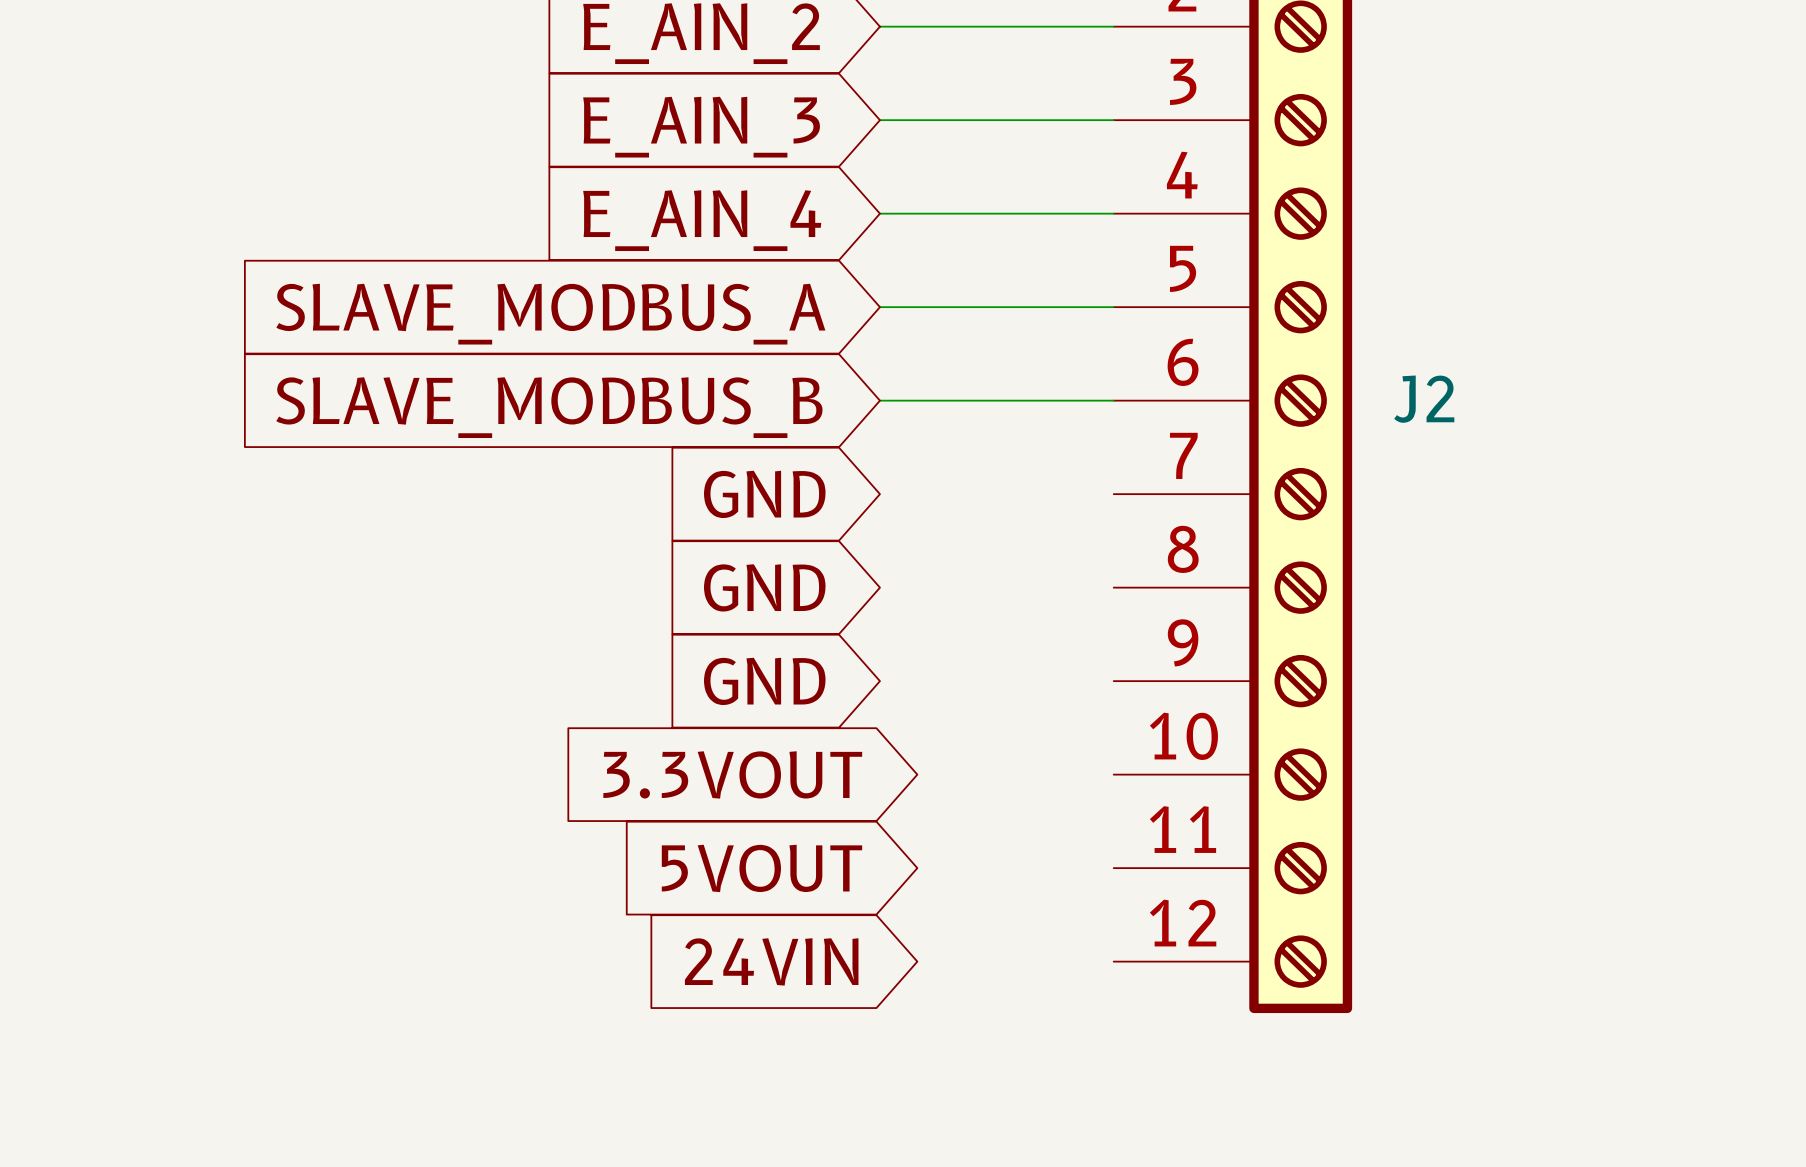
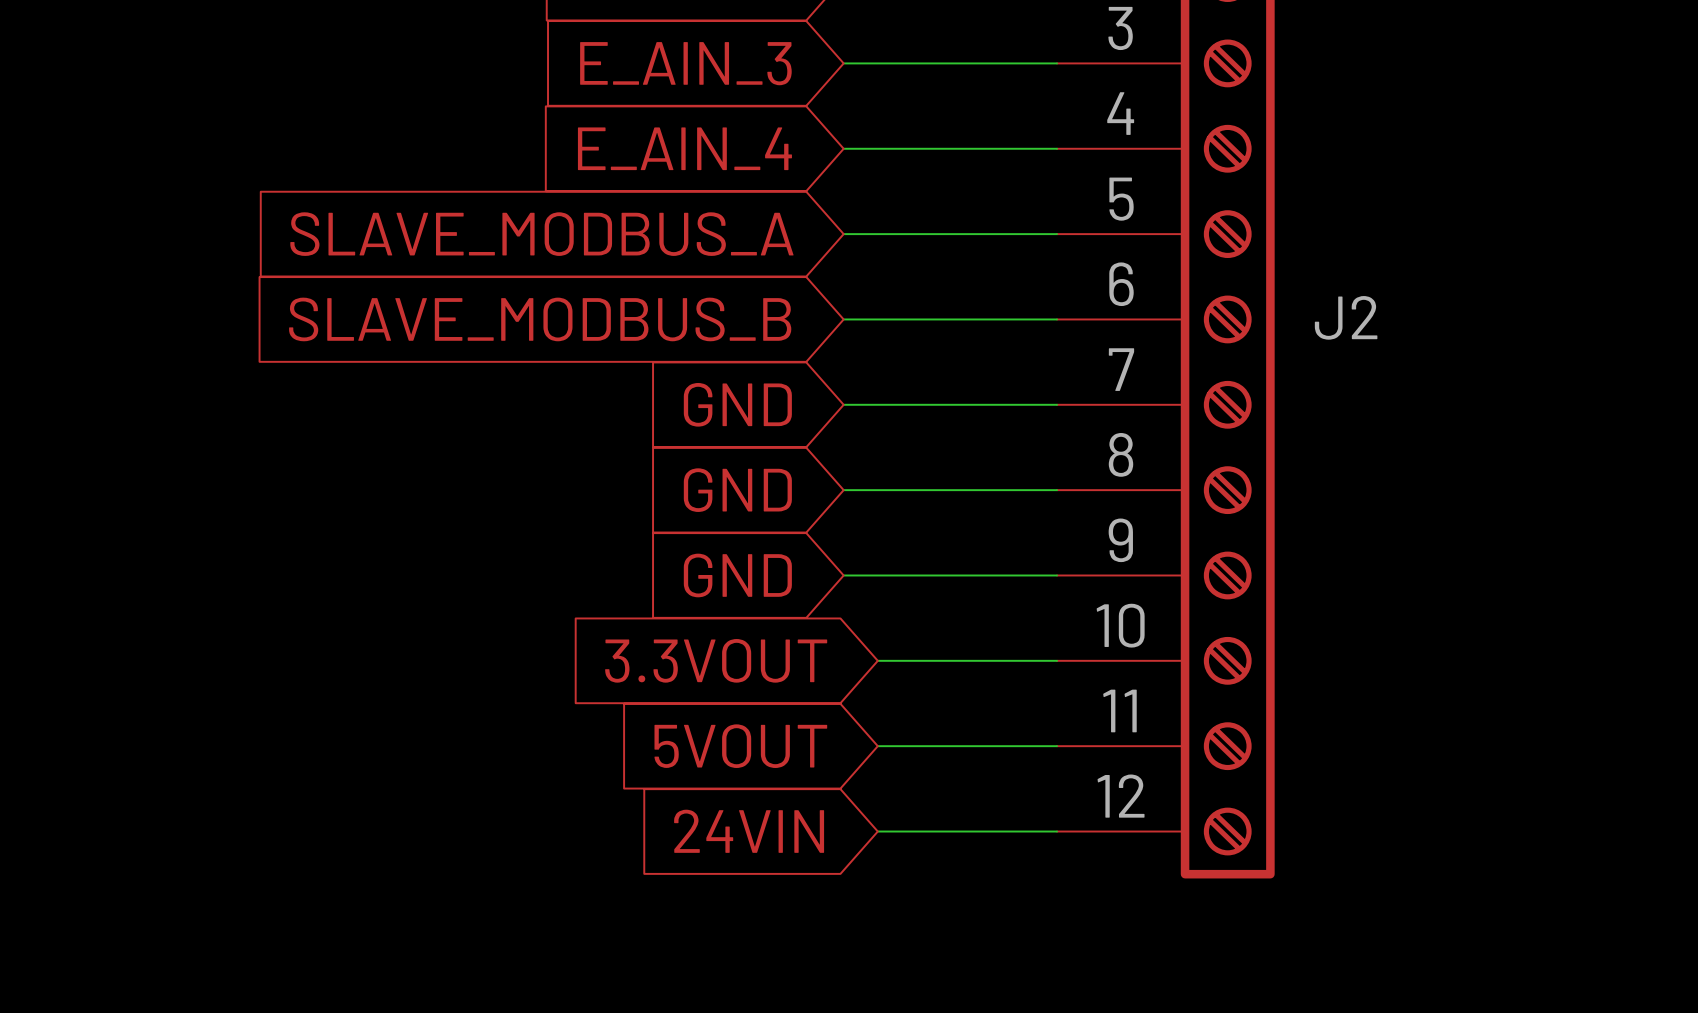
wire: none -> (843, 404) (1057, 404)
wire: none -> (843, 490) (1057, 490)
wire: none -> (843, 575) (1057, 575)
wire: none -> (877, 660) (1057, 660)
wire: none -> (877, 746) (1057, 746)
wire: none -> (877, 831) (1057, 831)

